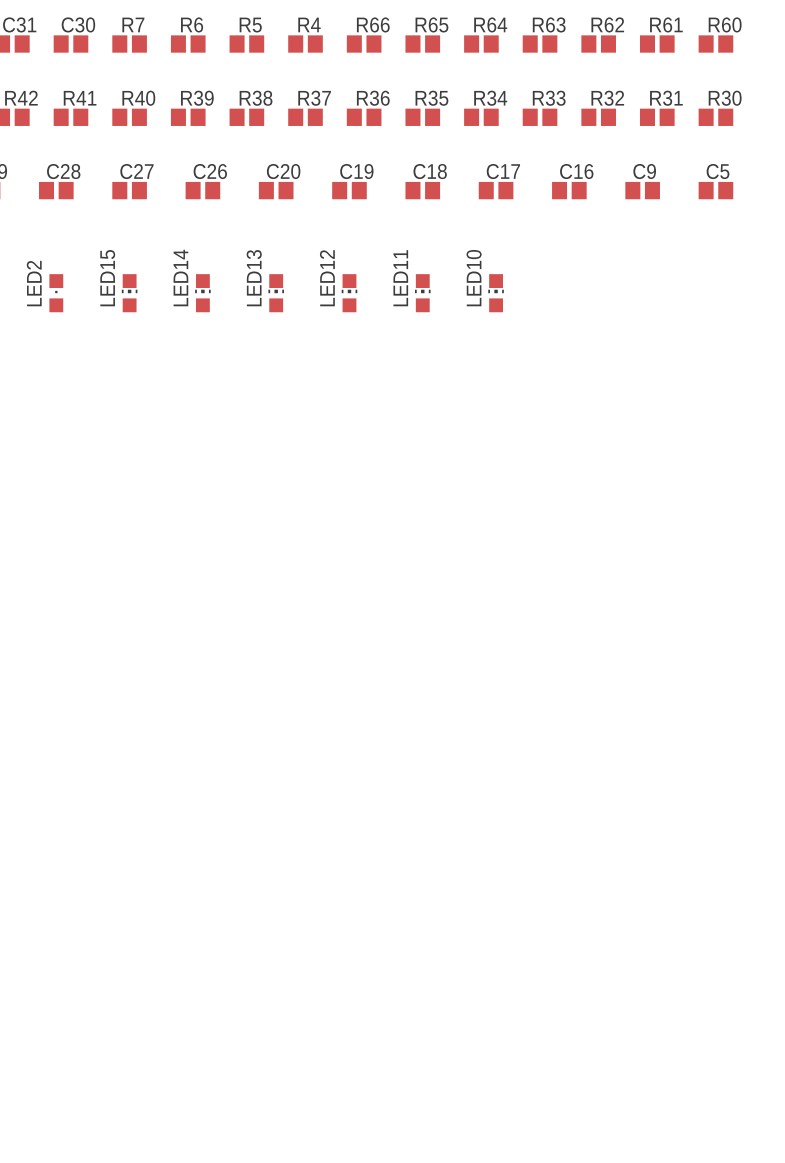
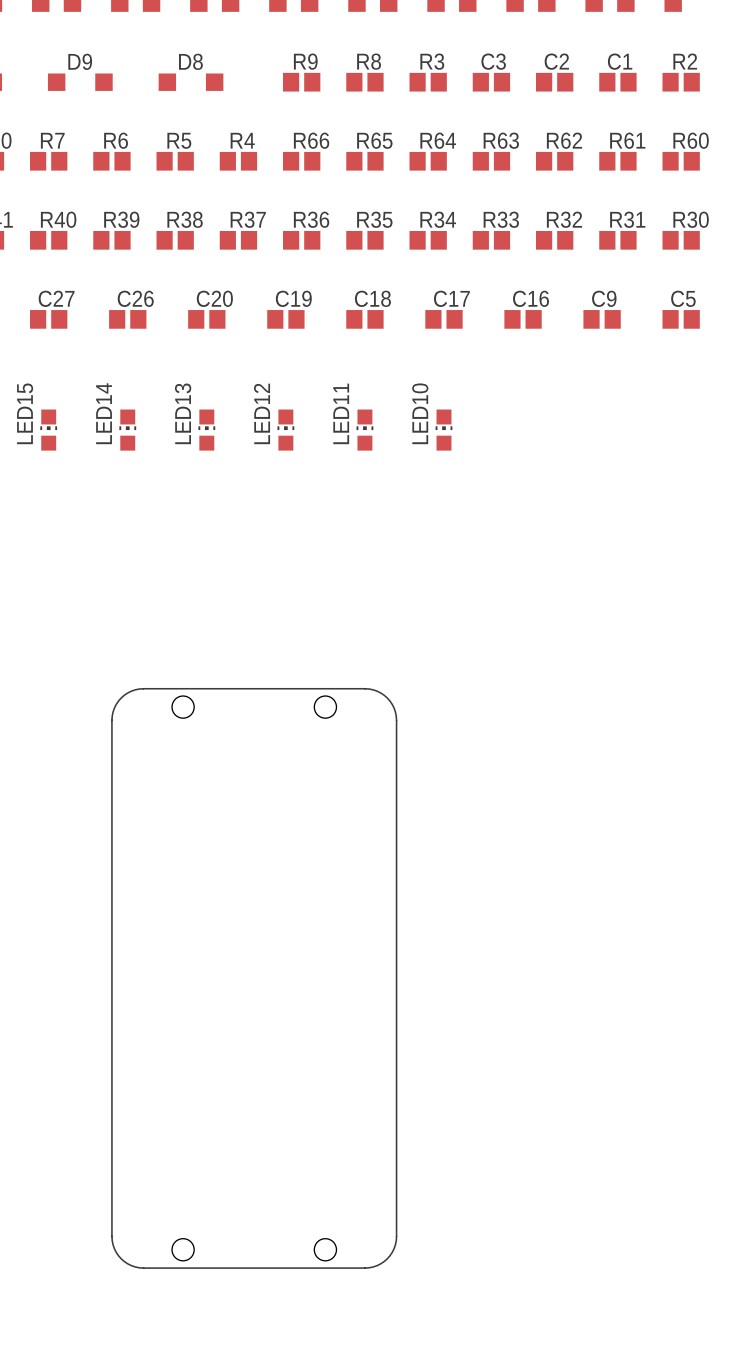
part: none -> (254, 978)

